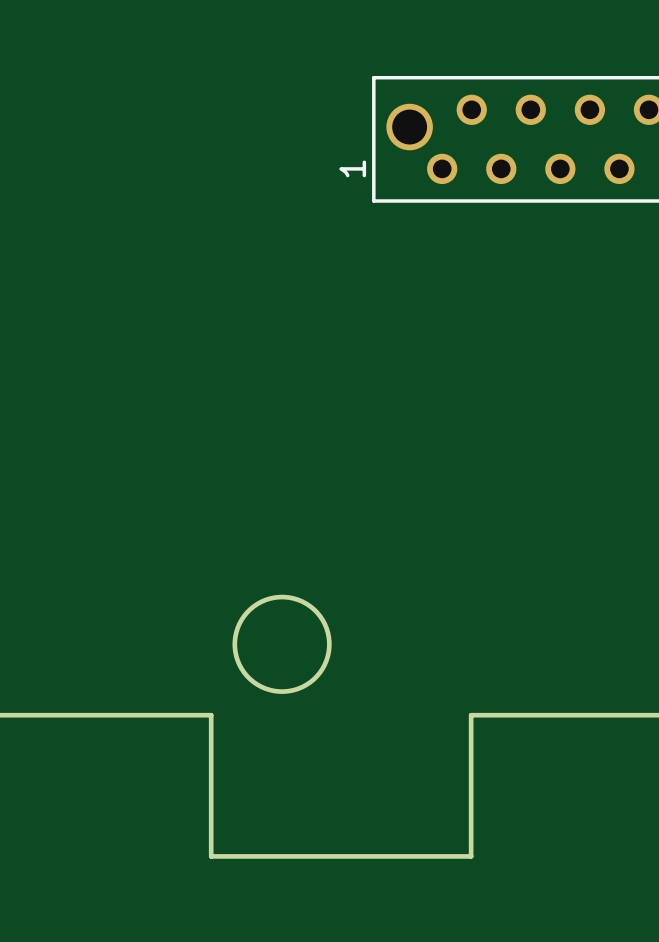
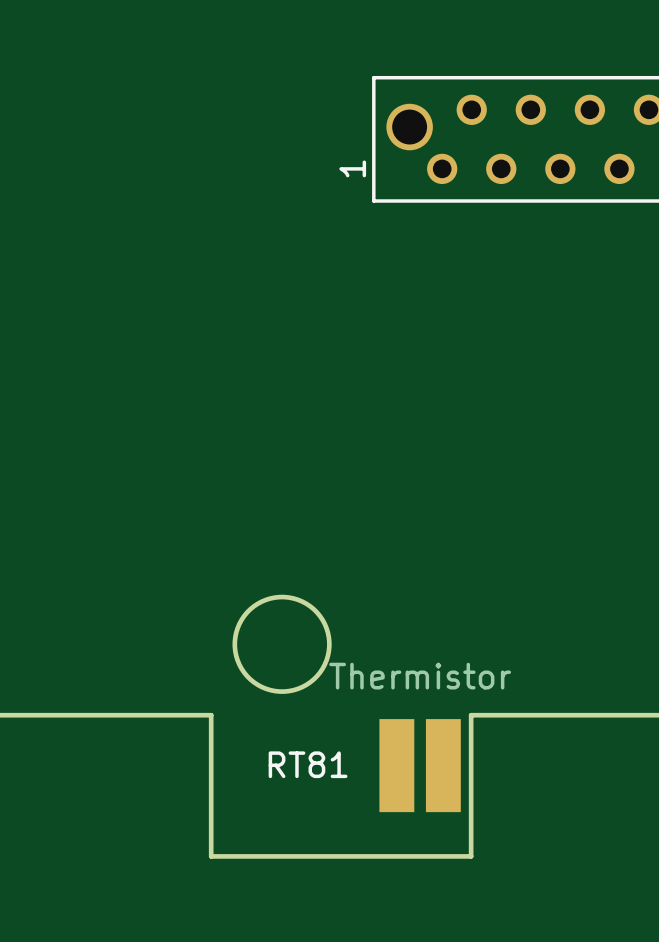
RT81: none -> Thermistor (420, 765)

